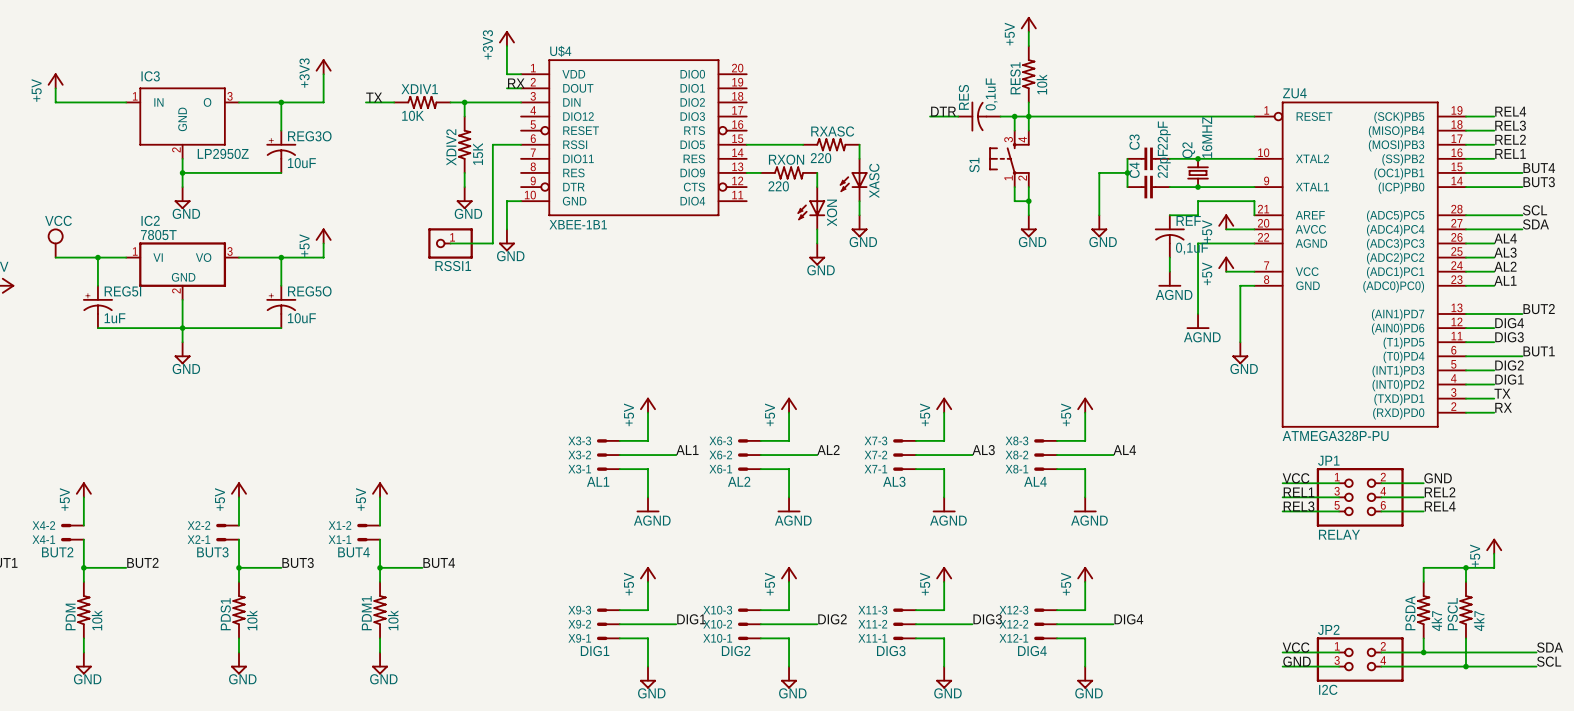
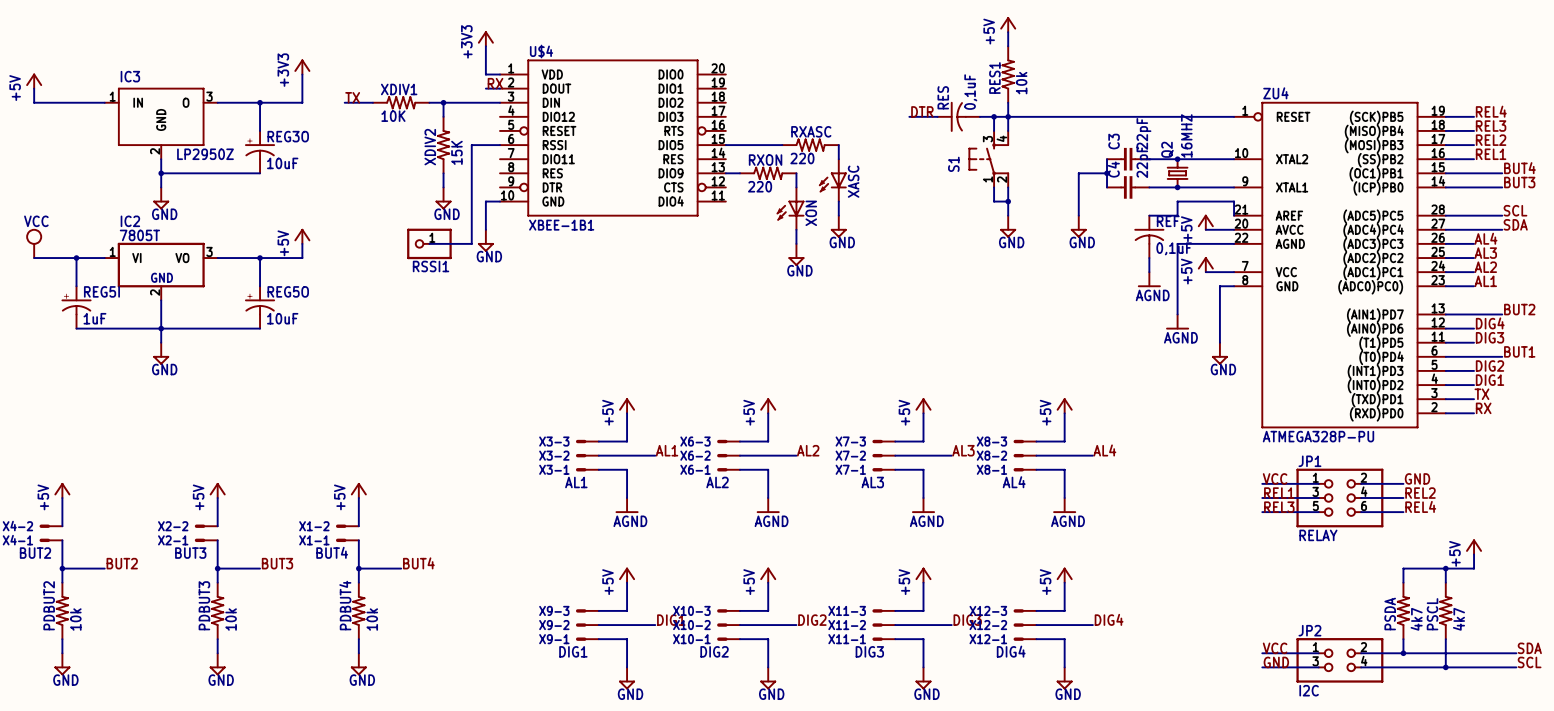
PDM1 name: PDM1 (366, 613) -> PDBUT4 (345, 605)
PDS1 name: PDS1 (225, 614) -> PDBUT3 (204, 605)
PDM name: PDM (70, 616) -> PDBUT2 (49, 605)

